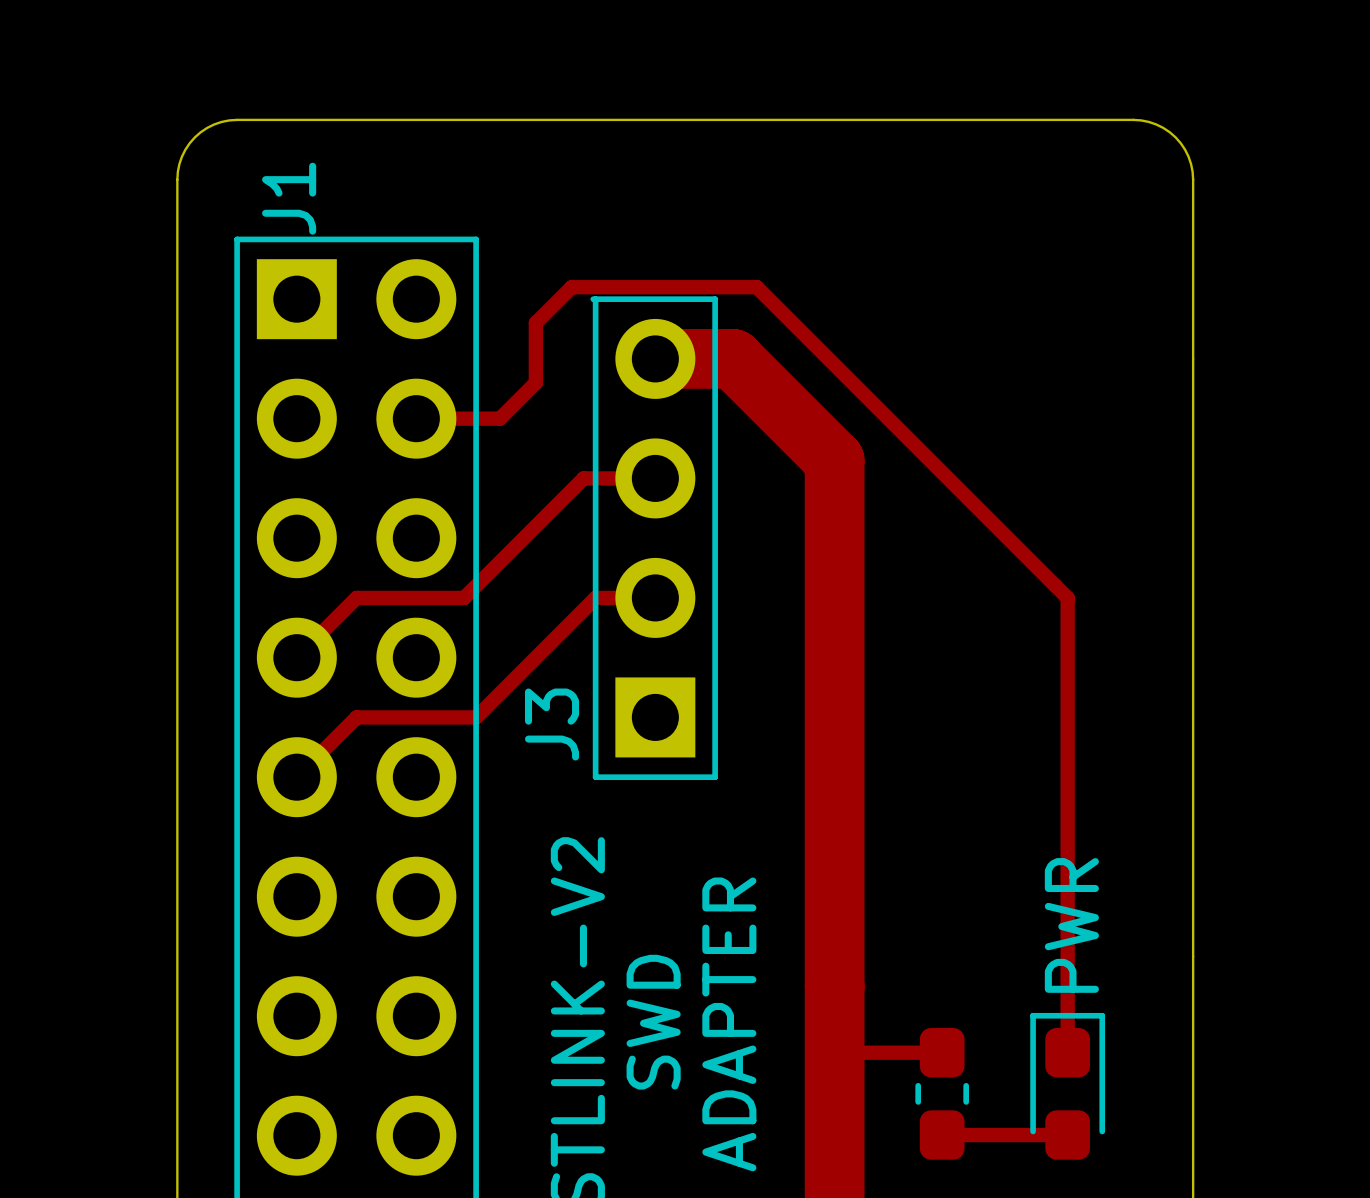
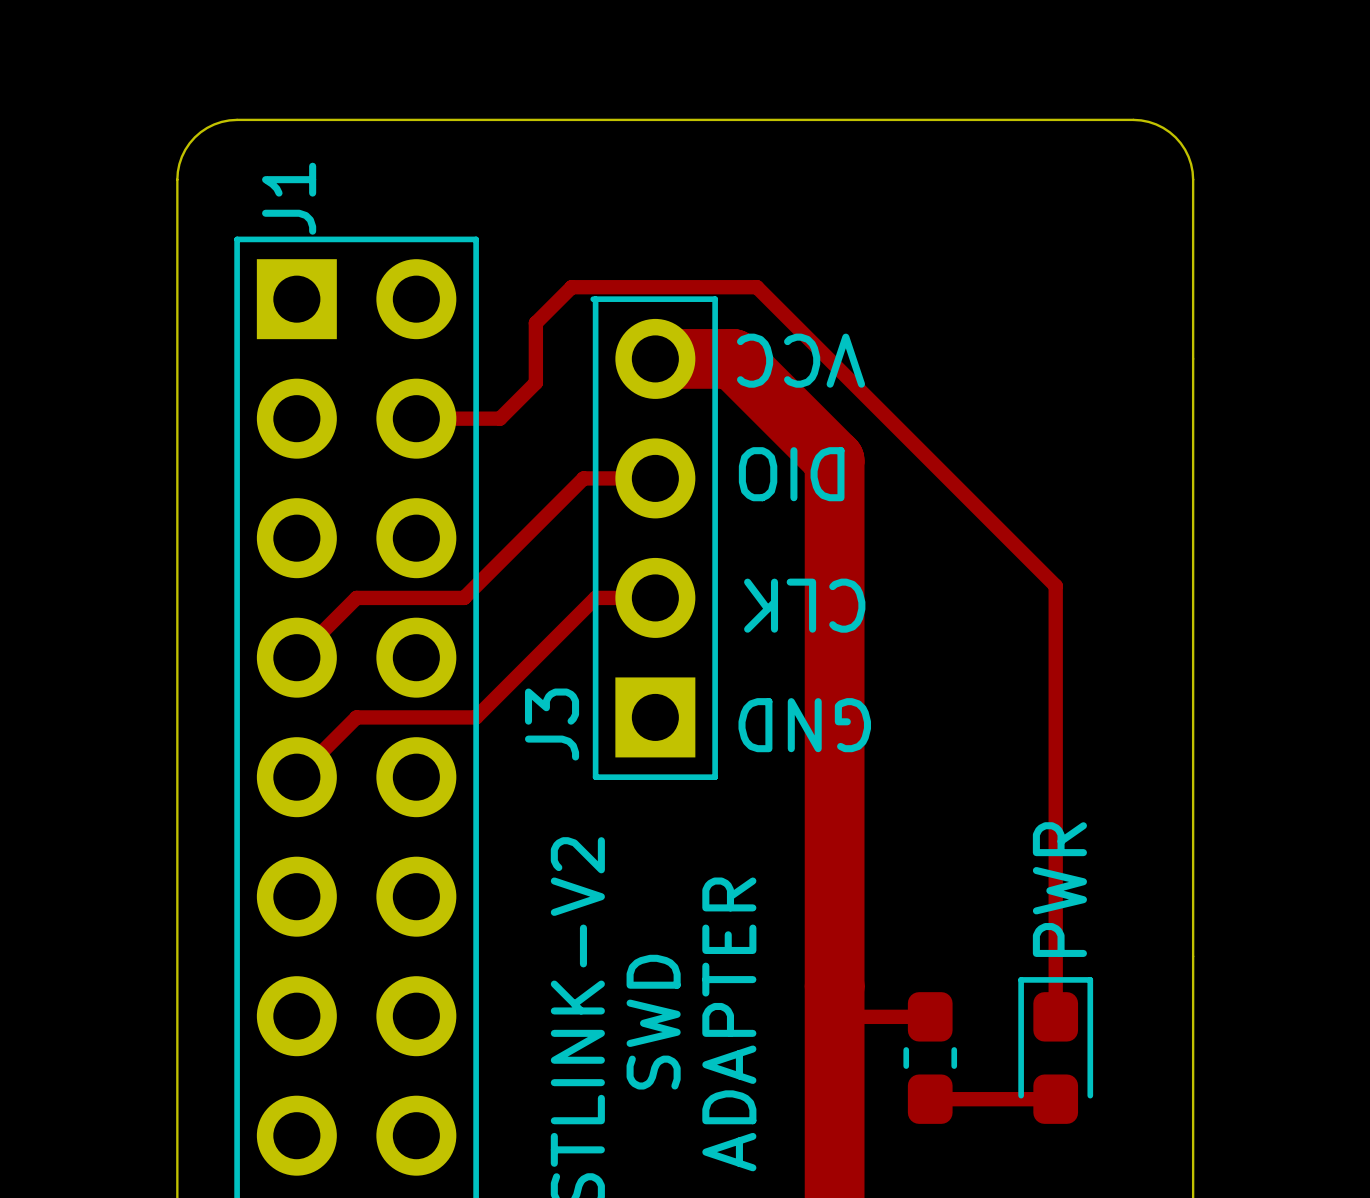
text: none -> VCC (801, 360)
text: none -> DIO (791, 474)
track: (1055, 585) (1067, 597) (1067, 1052) -> (1055, 585) (1055, 1016)
text: none -> CLK (804, 605)
text: none -> GND (804, 725)
text position: PWR (1071, 925) -> PWR (1059, 889)
track: (847, 1052) (942, 1052) -> (835, 1016) (930, 1016)
part position: (1067, 1086) -> (1055, 1050)
part position: (942, 1093) -> (930, 1058)
track: (942, 1135) (1067, 1135) -> (930, 1099) (1055, 1099)

